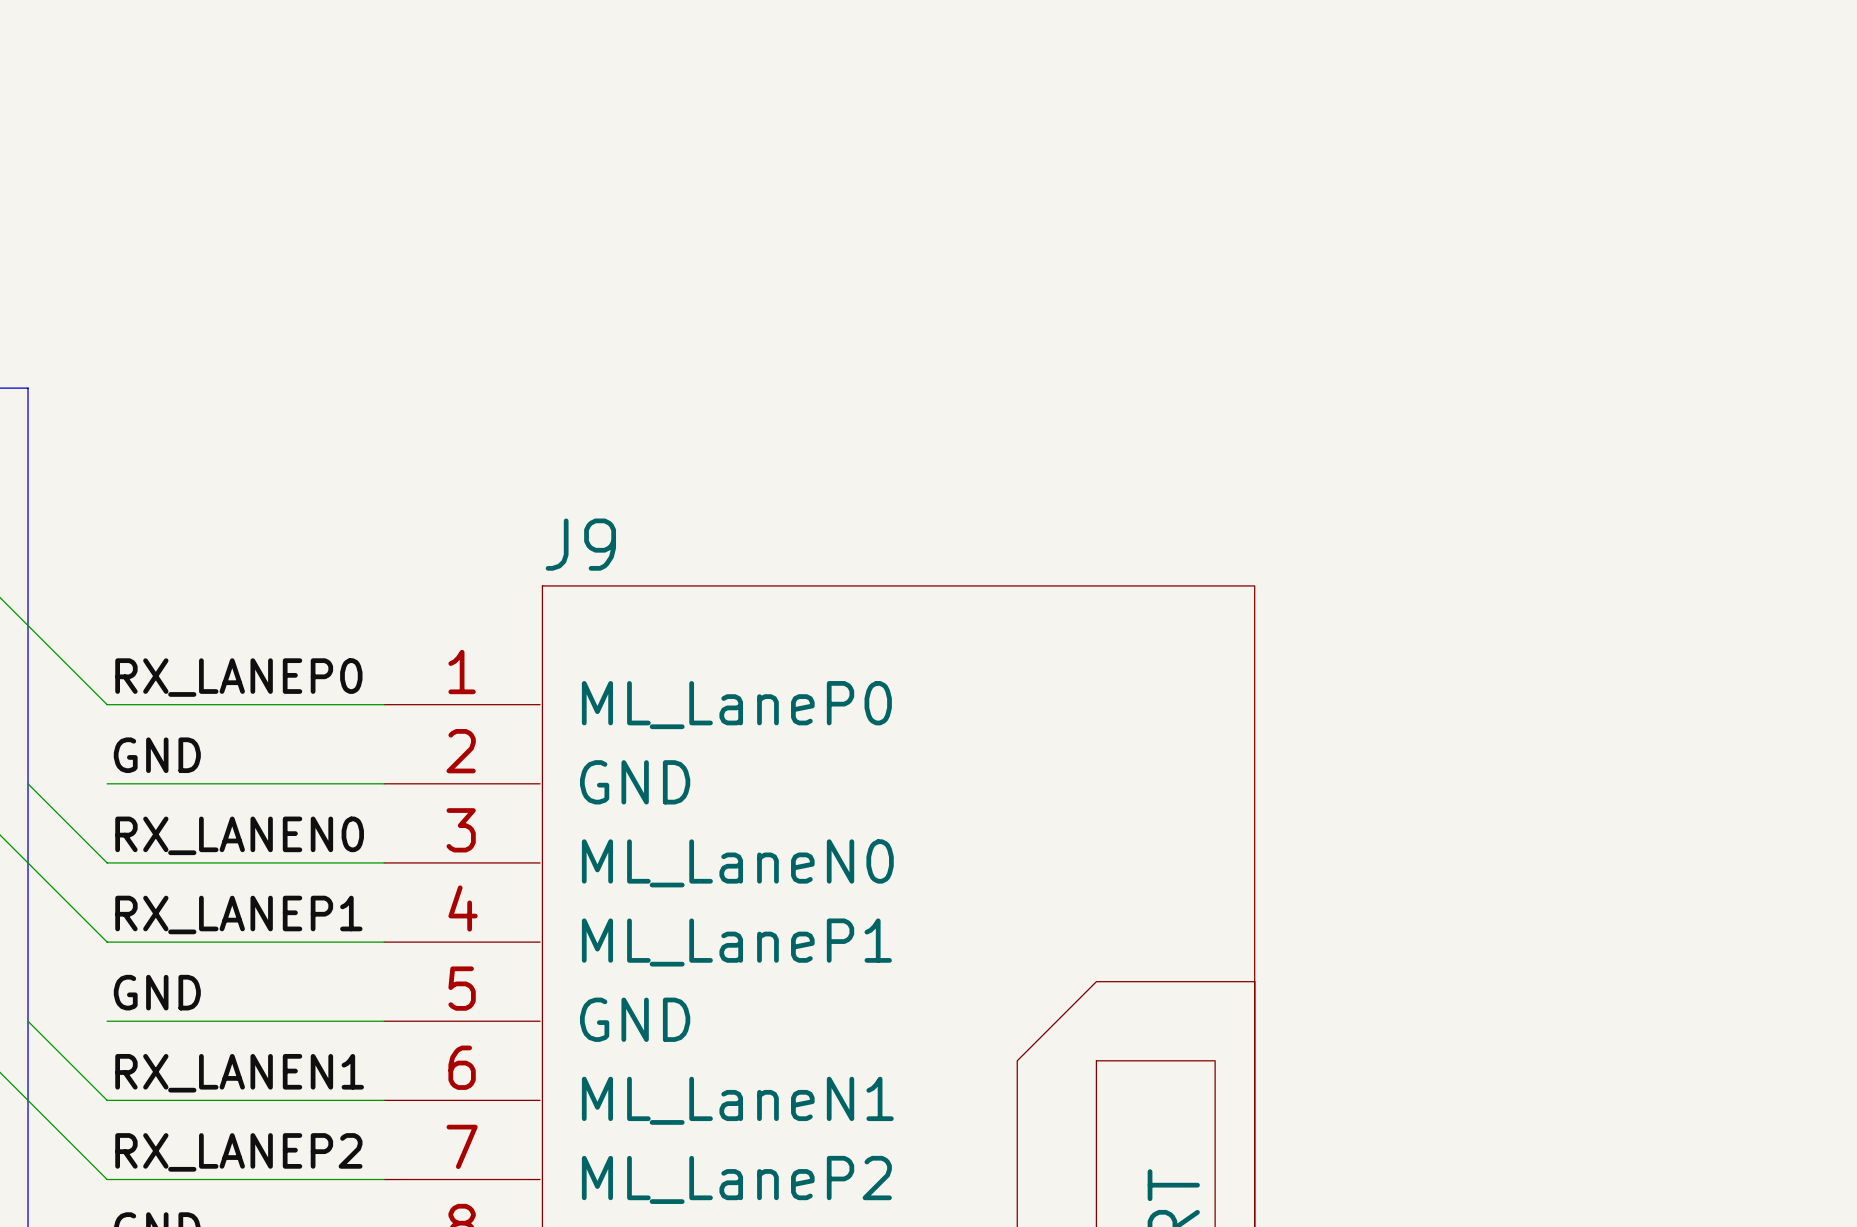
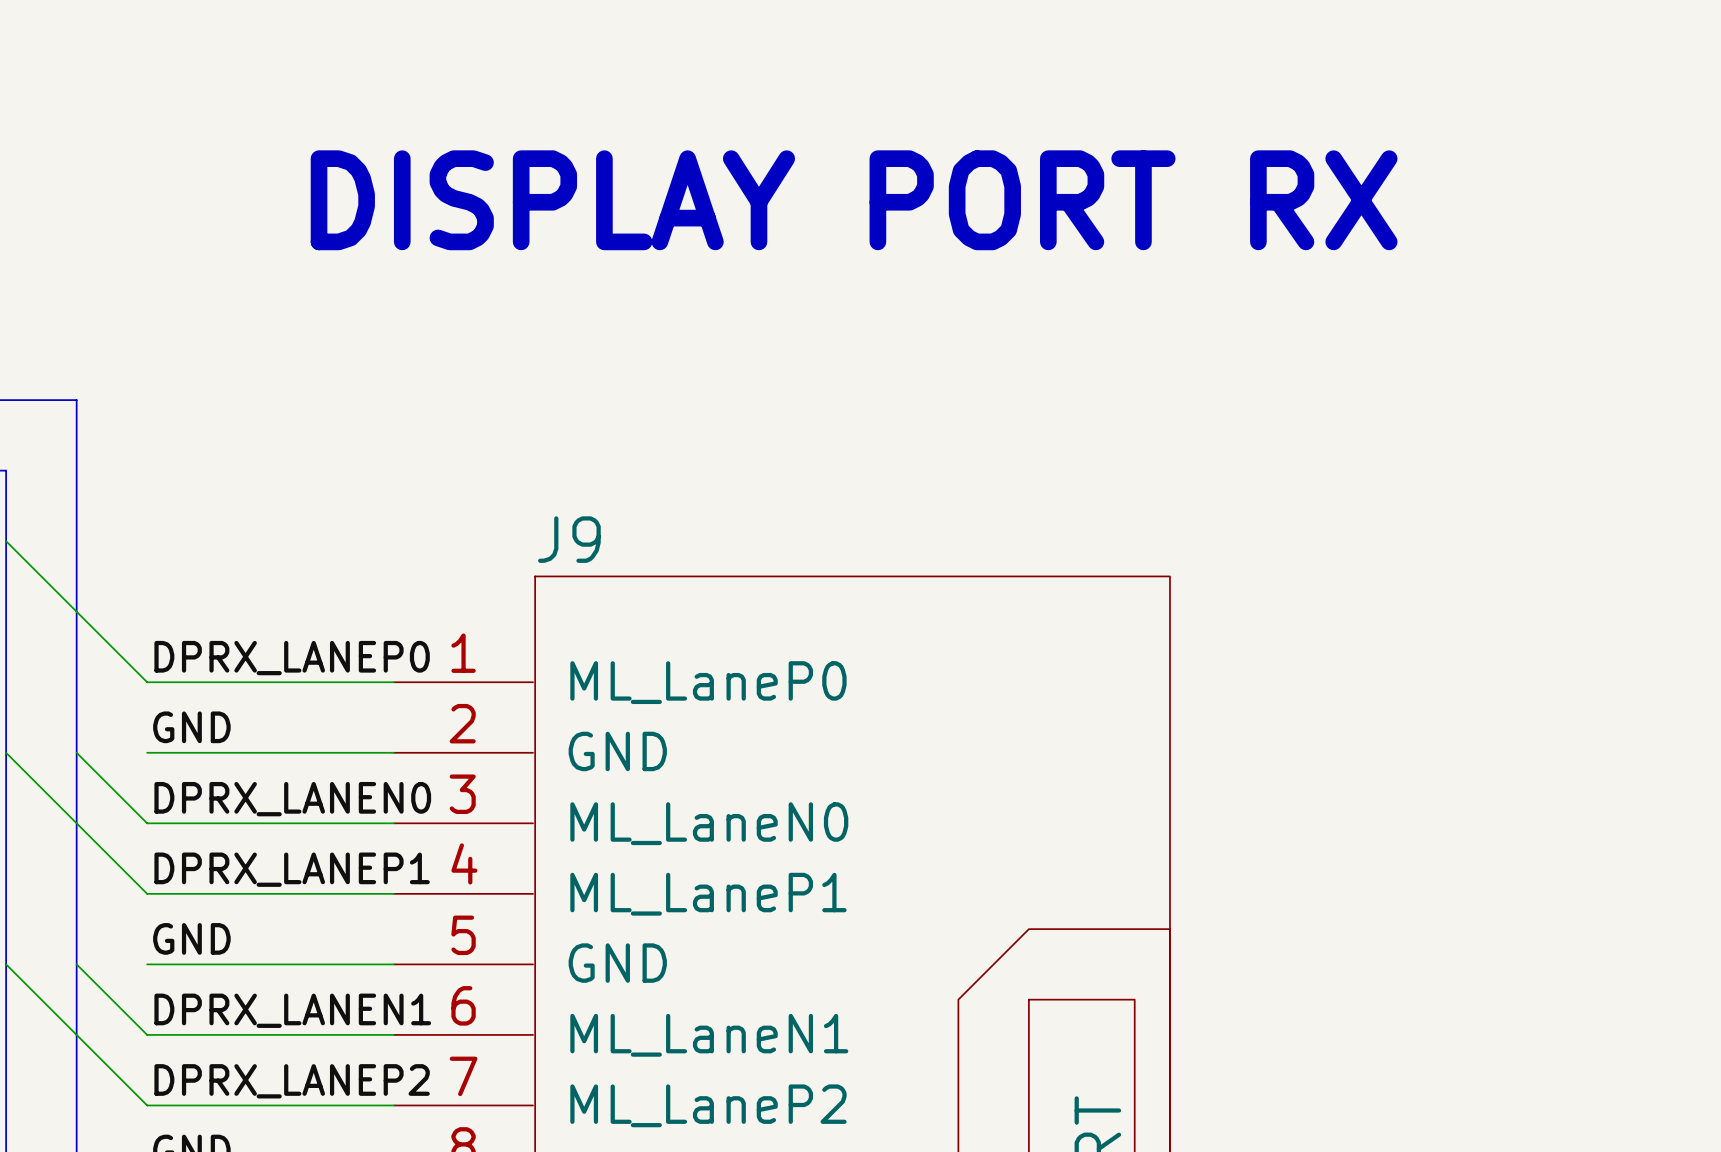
text: none -> DISPLAY PORT RX (854, 200)
label: RX_LANEP0 (238, 677) -> DPRX_LANEP0 (292, 658)
label: RX_LANEN0 (239, 835) -> DPRX_LANEN0 (292, 799)
label: RX_LANEP1 (238, 914) -> DPRX_LANEP1 (292, 869)
label: RX_LANEN1 (239, 1073) -> DPRX_LANEN1 (292, 1010)
label: RX_LANEP2 (238, 1152) -> DPRX_LANEP2 (292, 1081)

